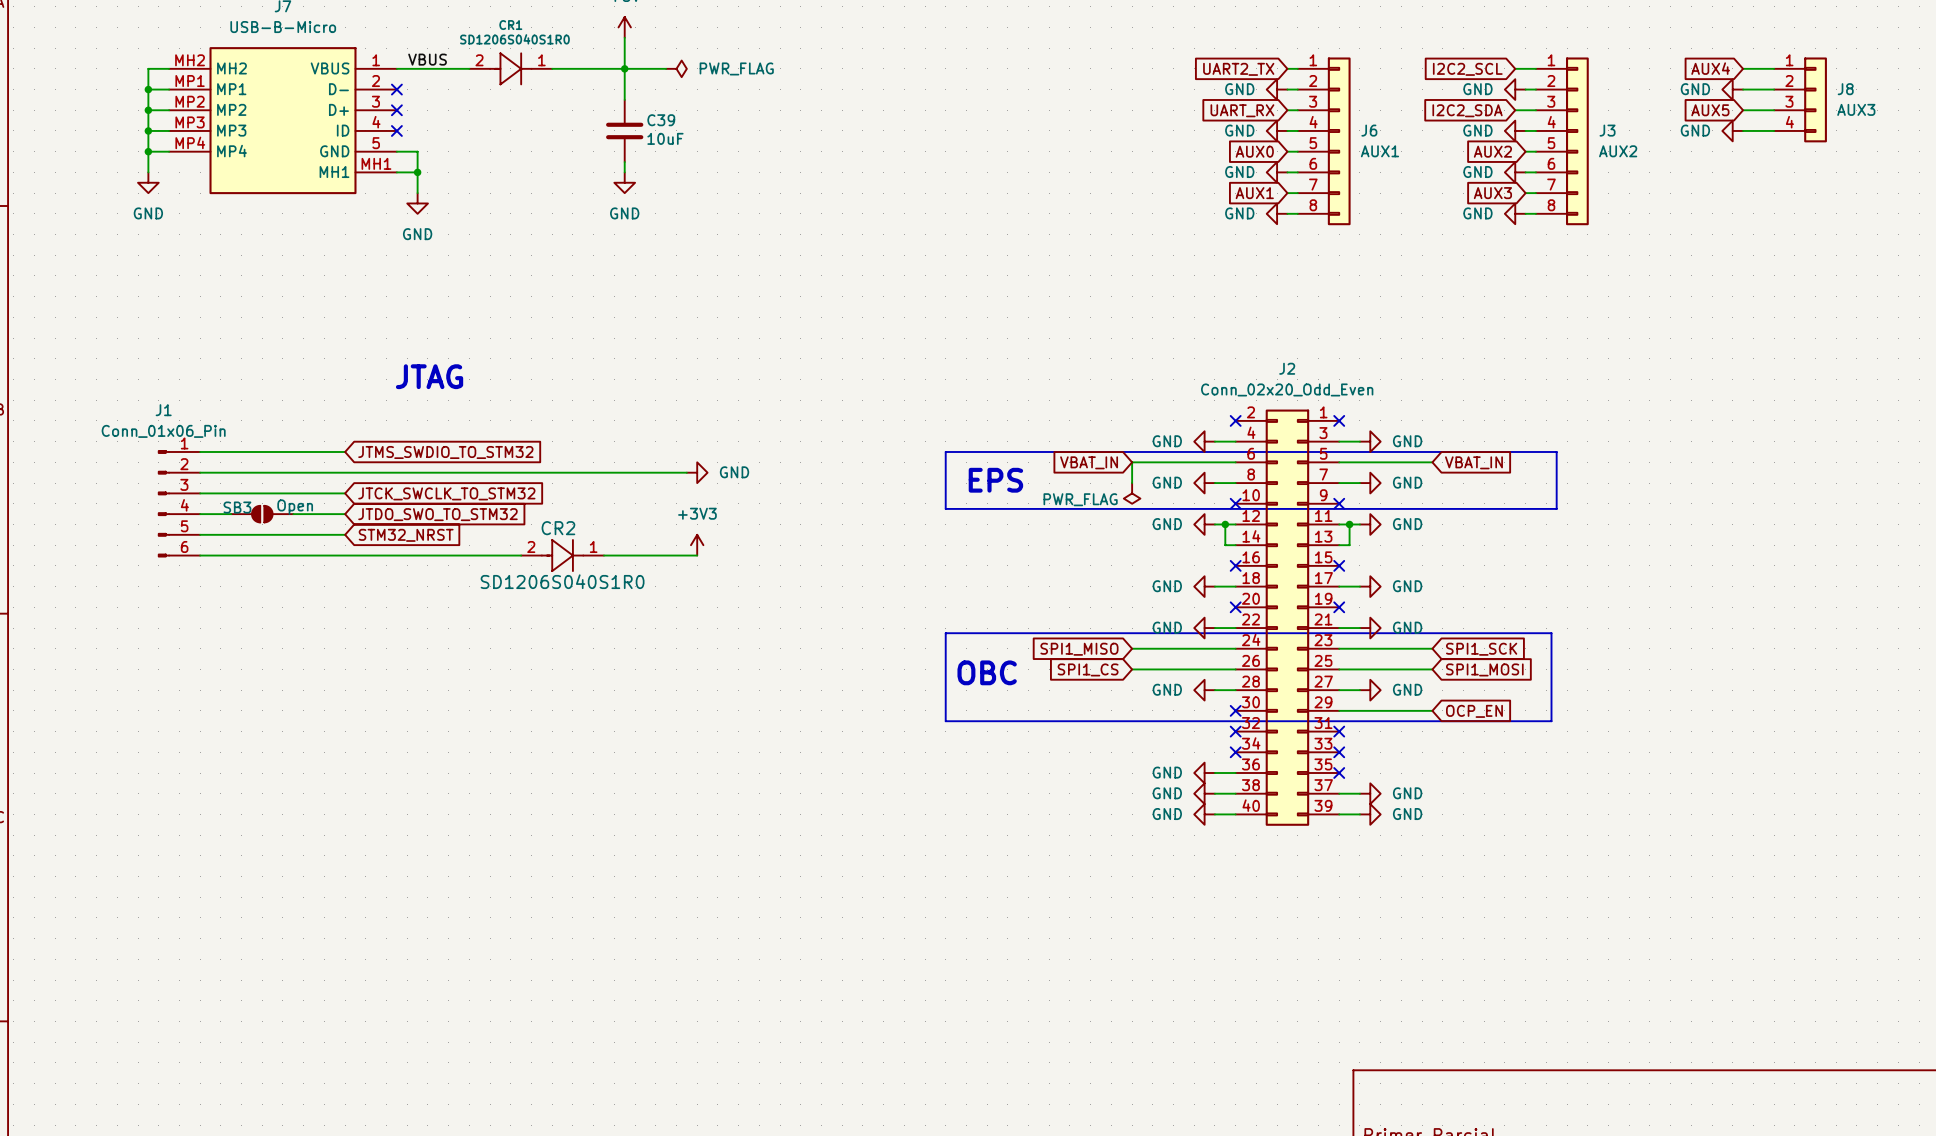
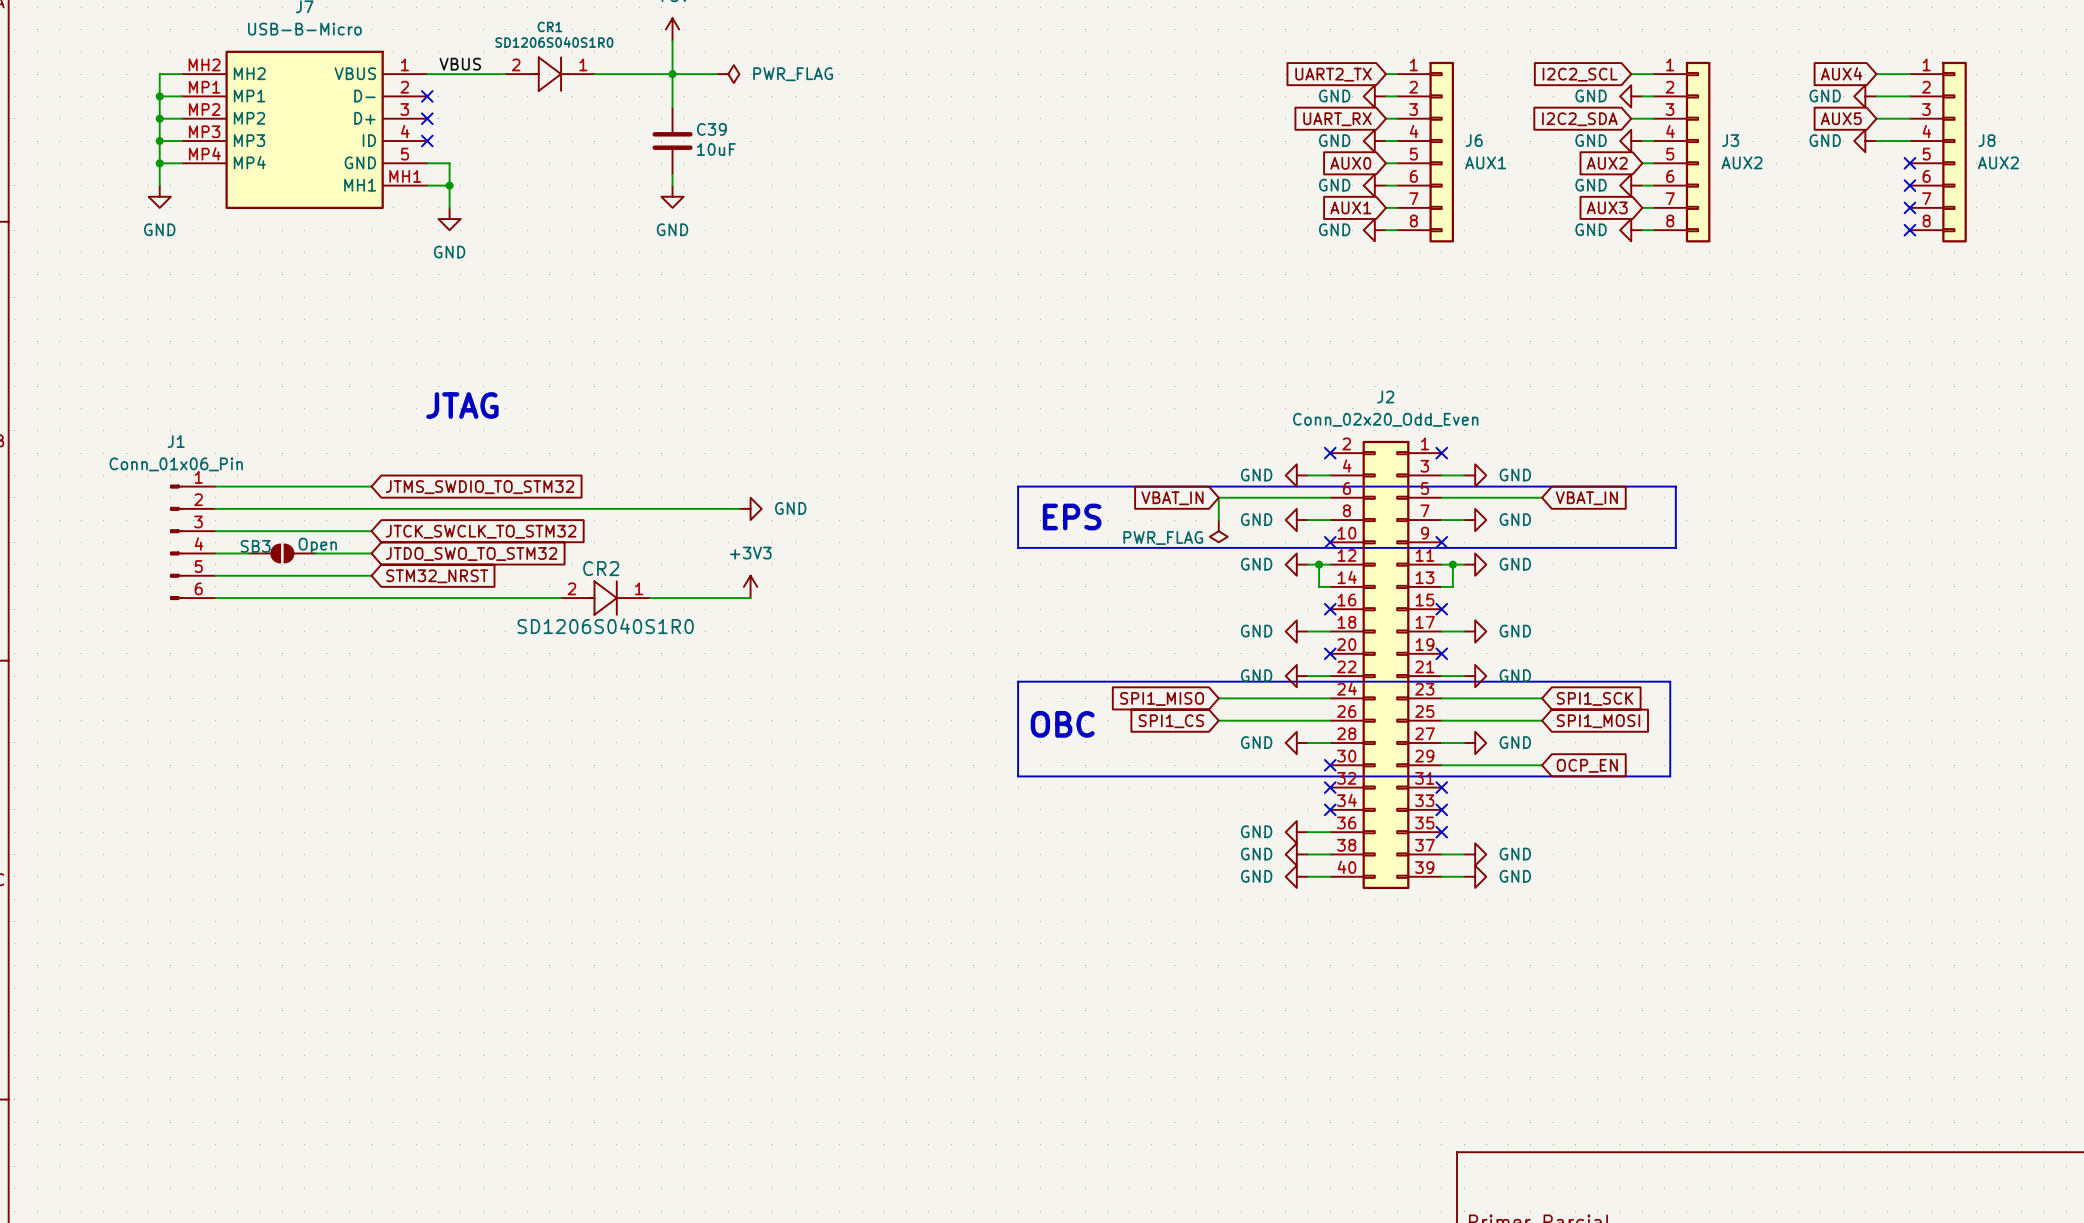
J8 symbol: [1774, 57, 1827, 143] -> [1909, 61, 1967, 243]
J8 value: AUX3 (1856, 109) -> AUX2 (1998, 162)
no-connect mark: none -> (1909, 163)
no-connect mark: none -> (1909, 185)
no-connect mark: none -> (1909, 207)
no-connect mark: none -> (1909, 230)

